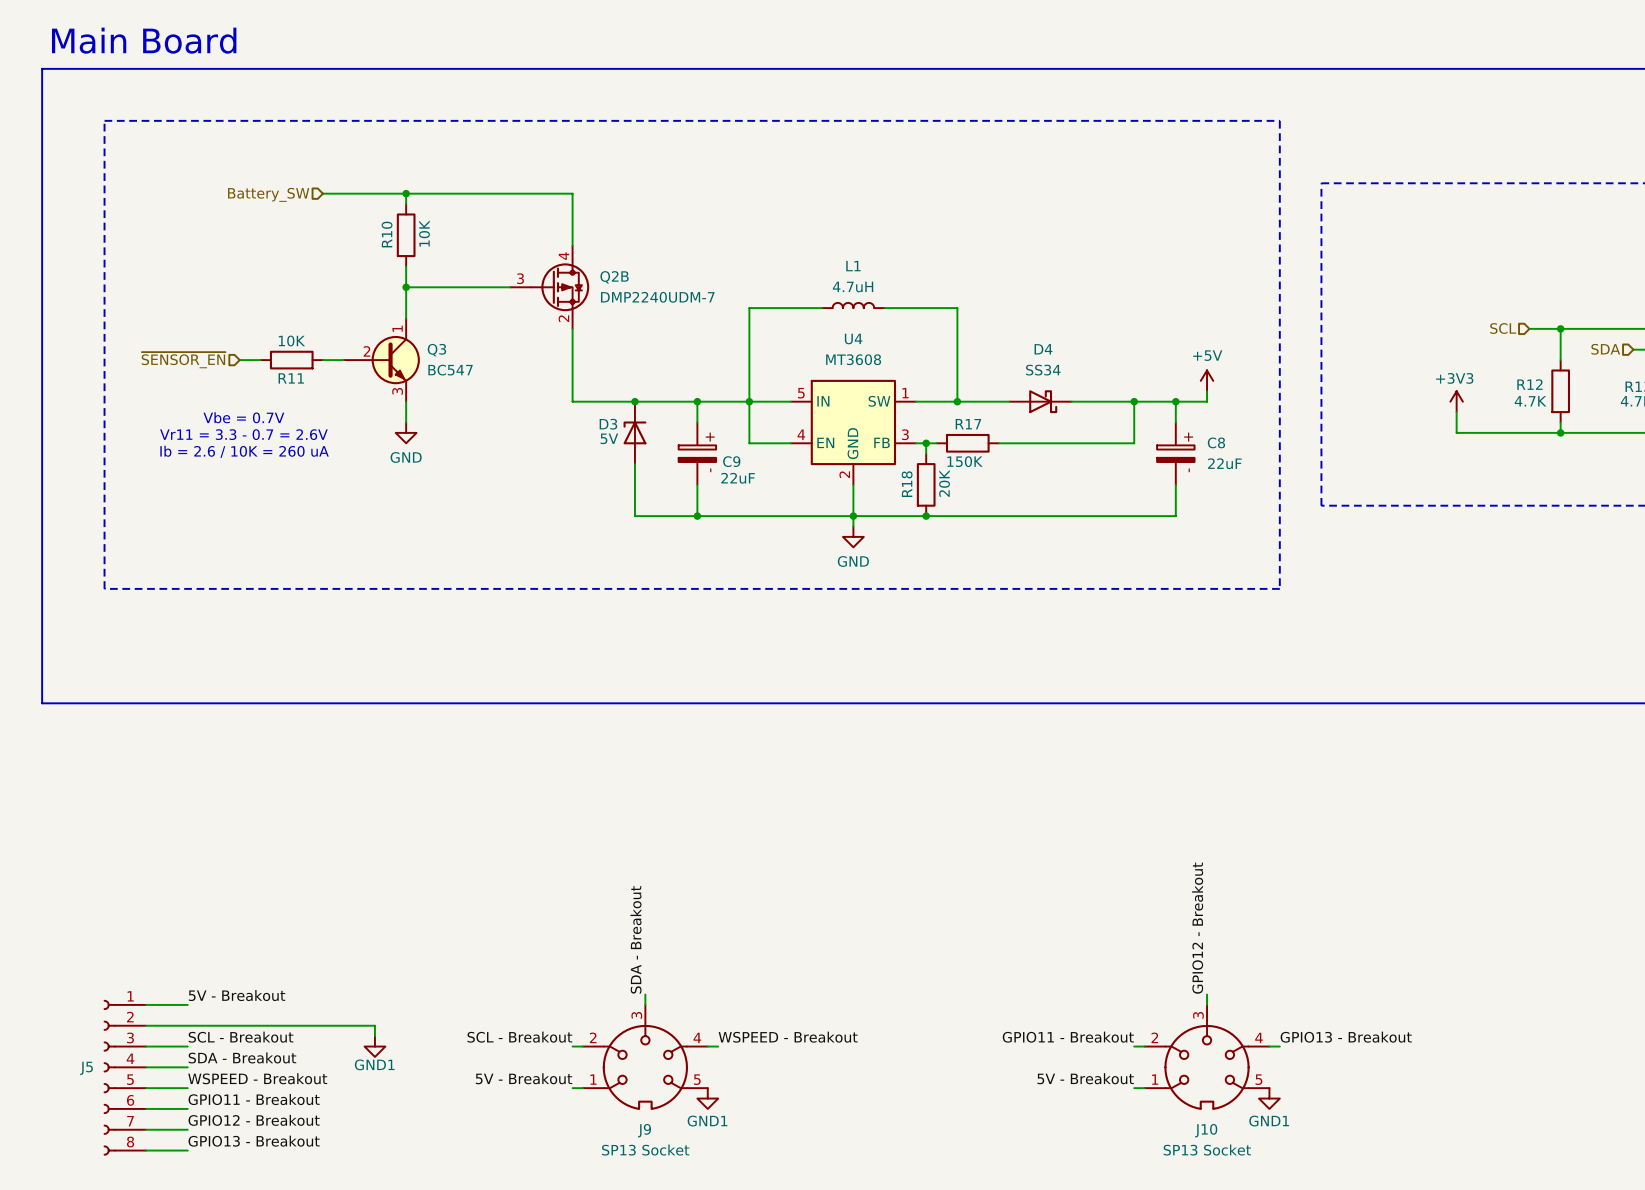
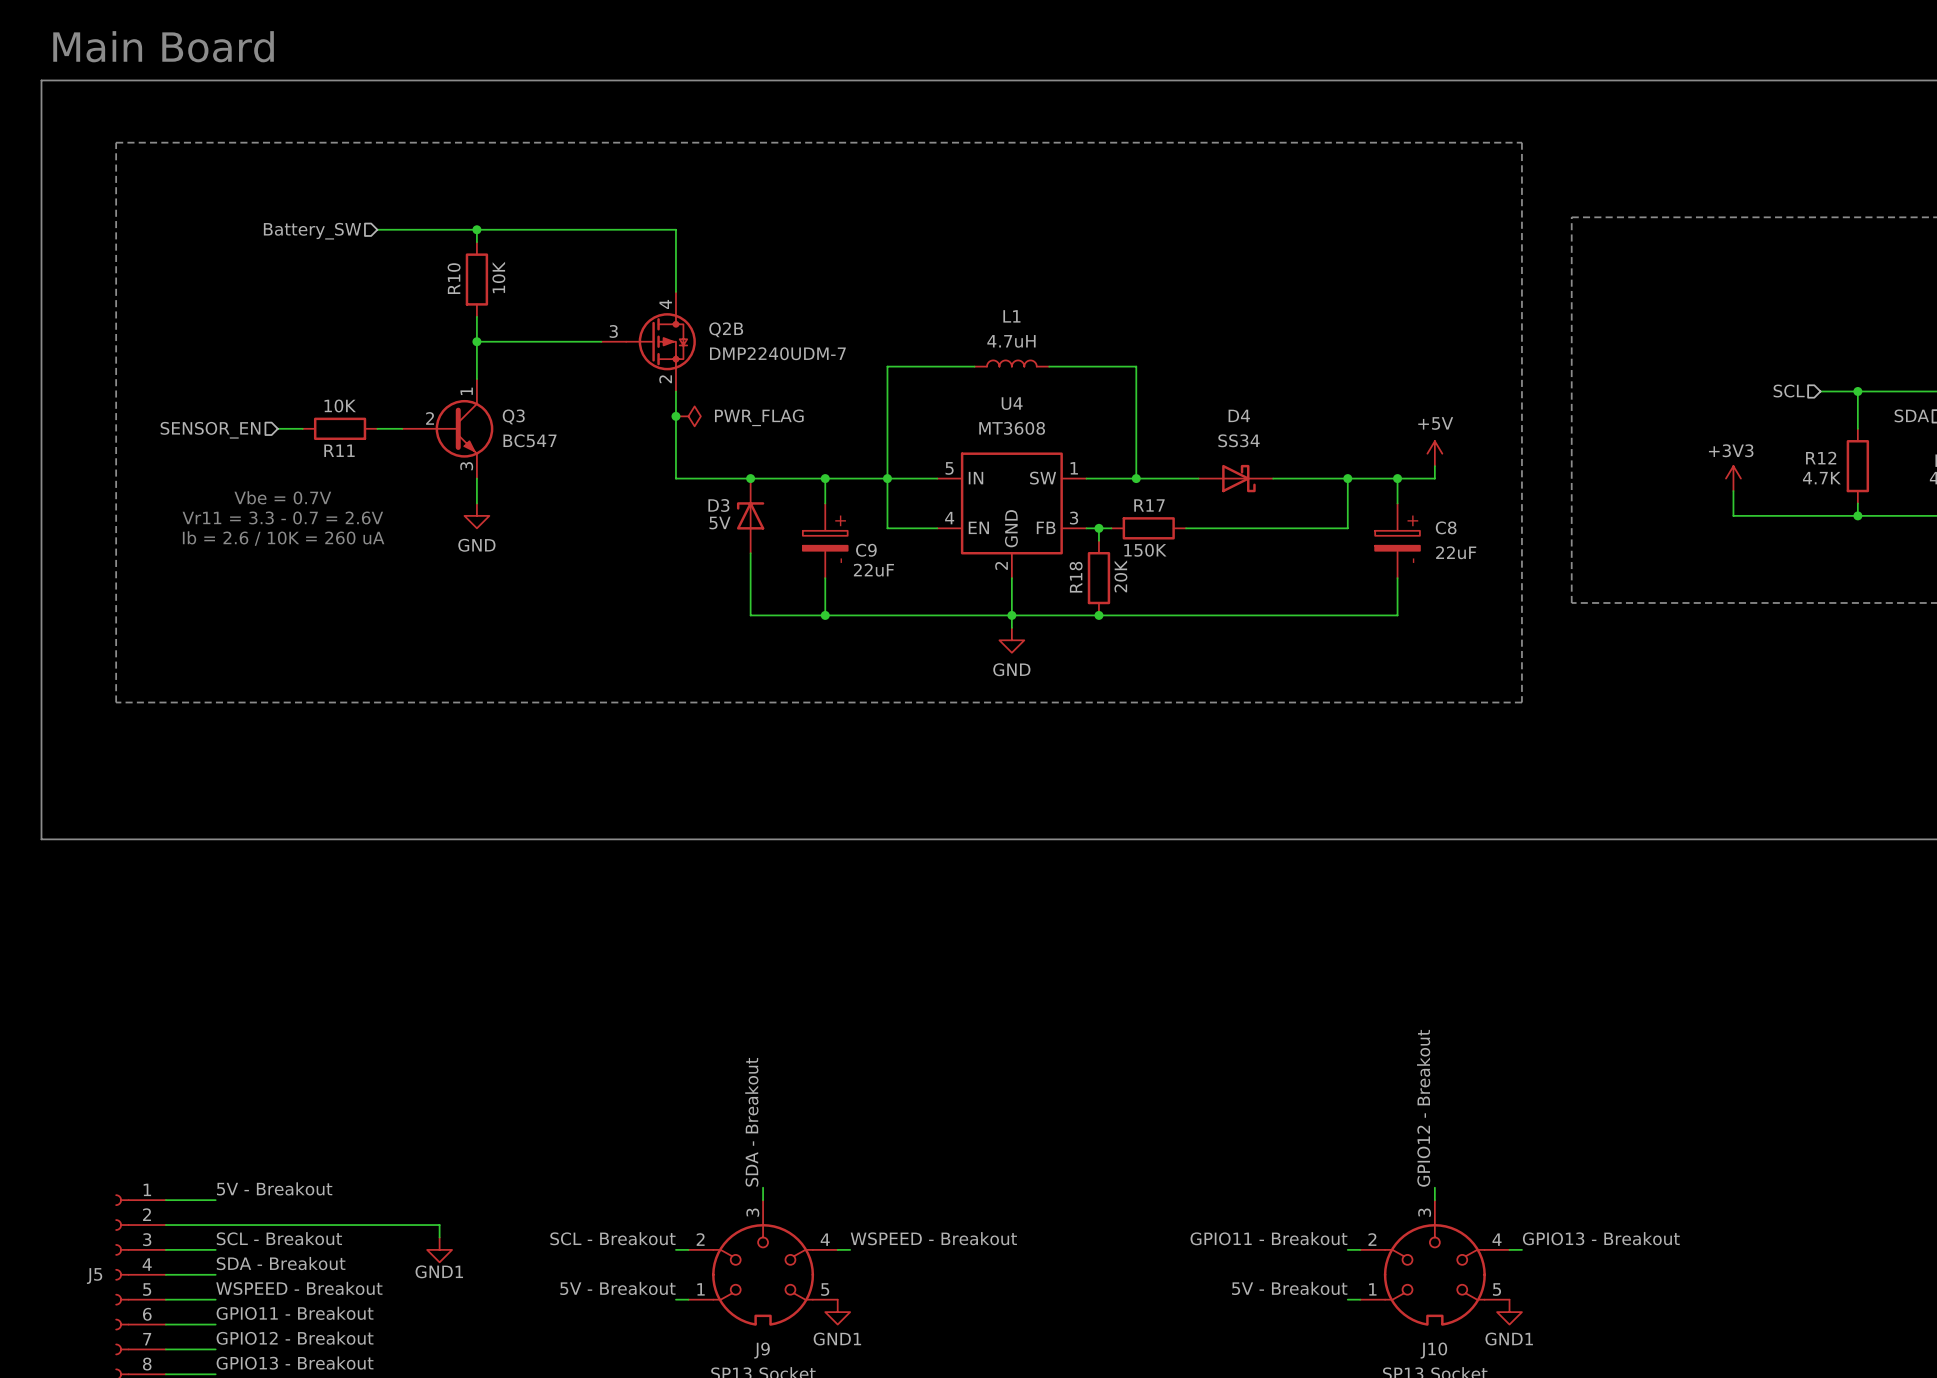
junction: none -> (675, 416)
power symbol: none -> PWR_FLAG (688, 416)
hierarchical label: ~{SENSOR_EN} (183, 360) -> SENSOR_EN (210, 430)

